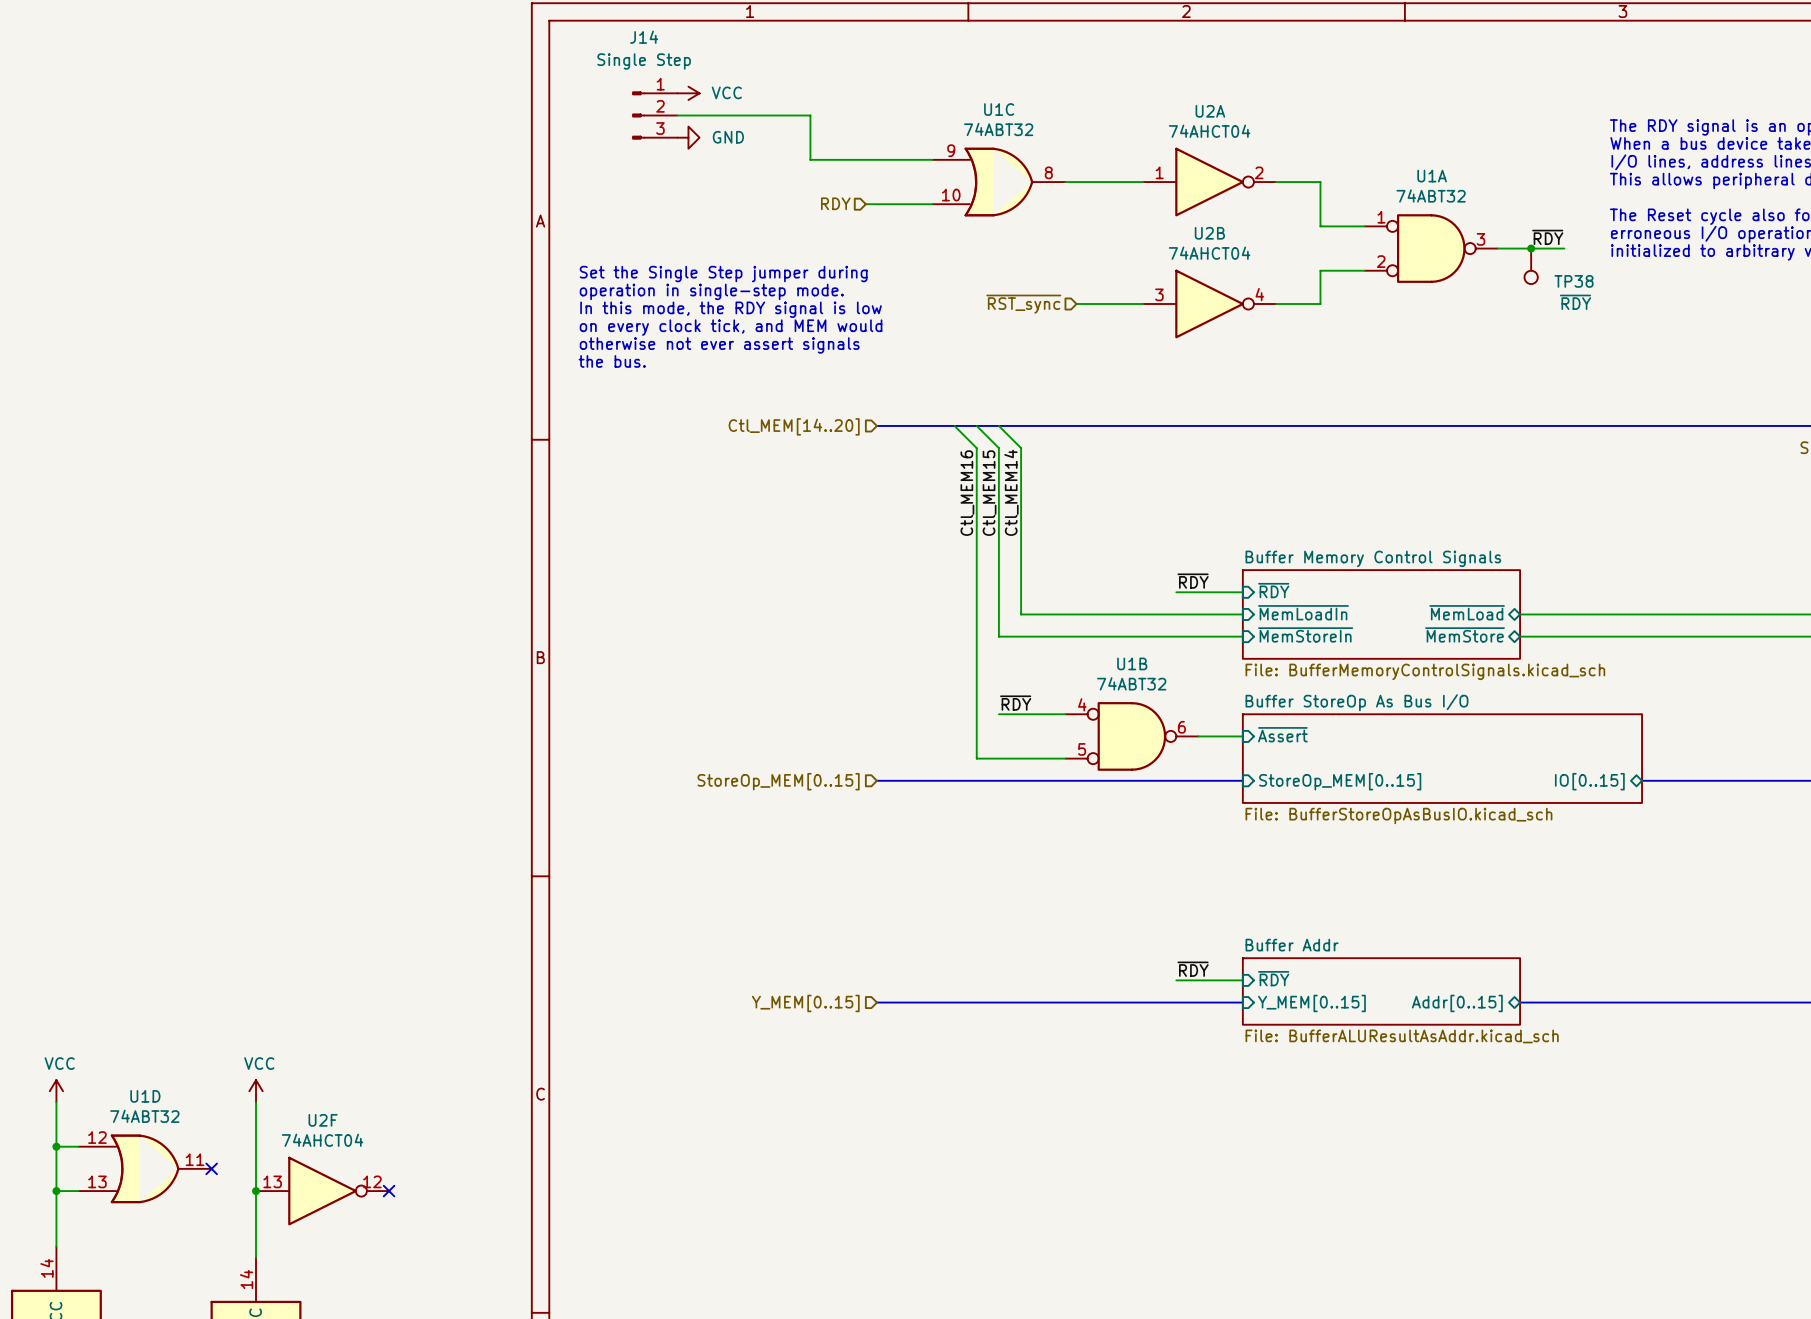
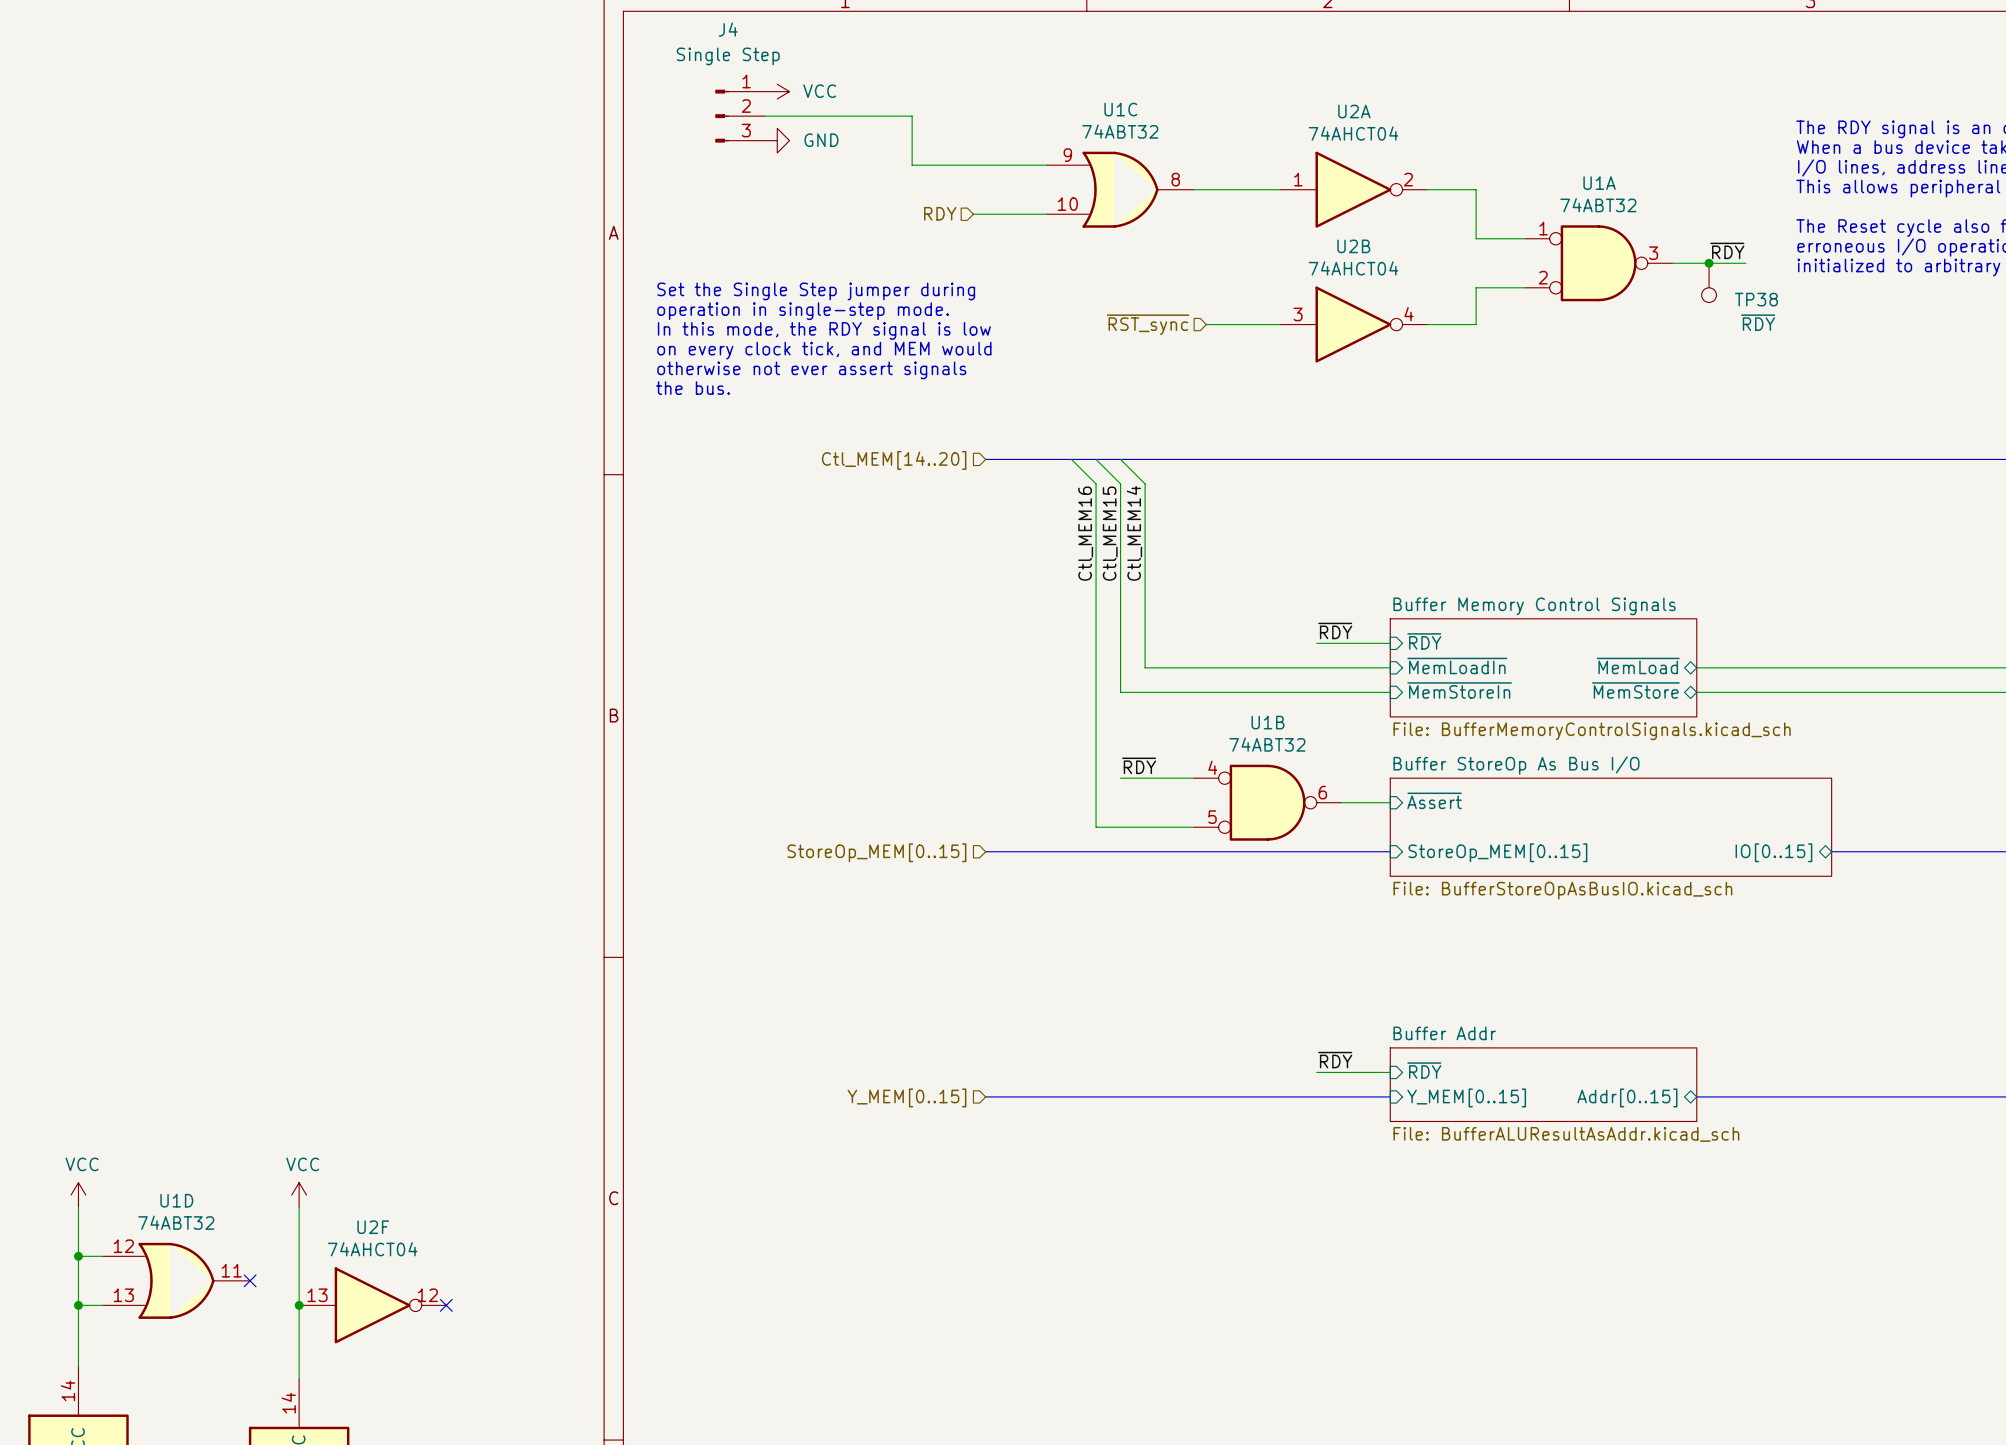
J14 name: J14 (644, 37) -> J4 (728, 29)

